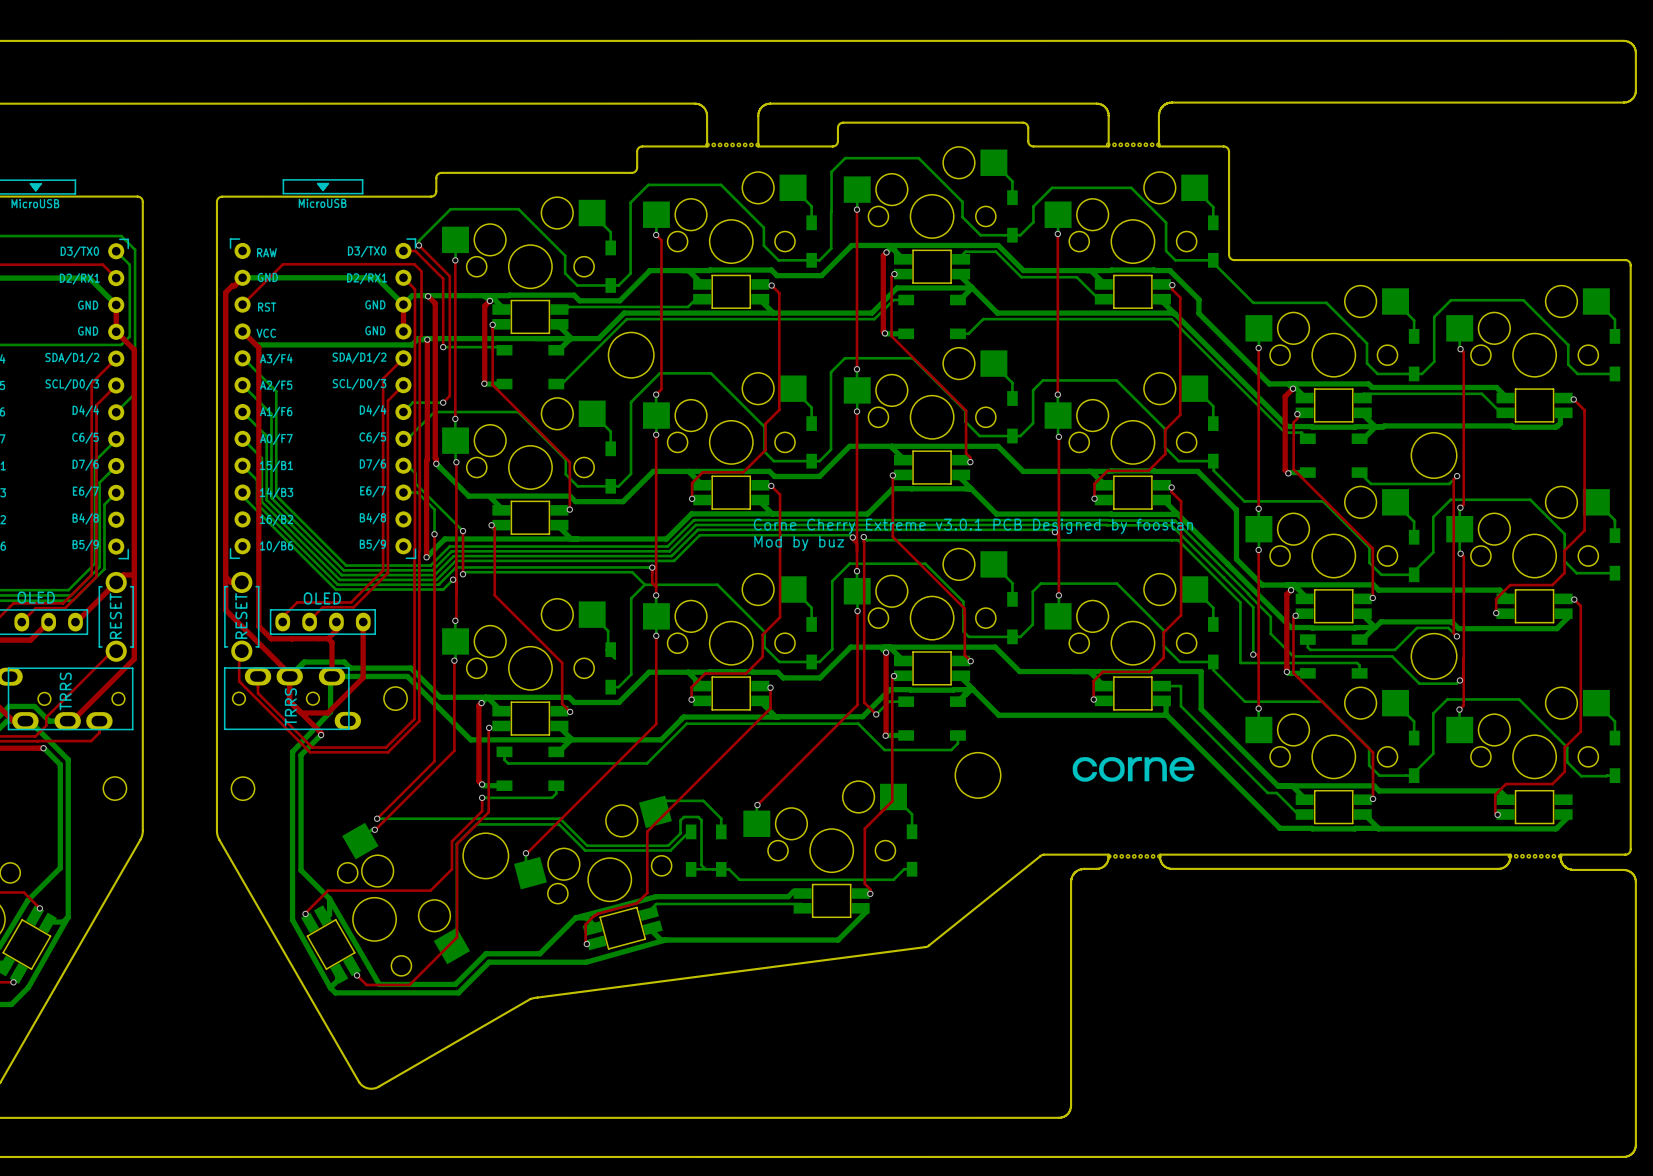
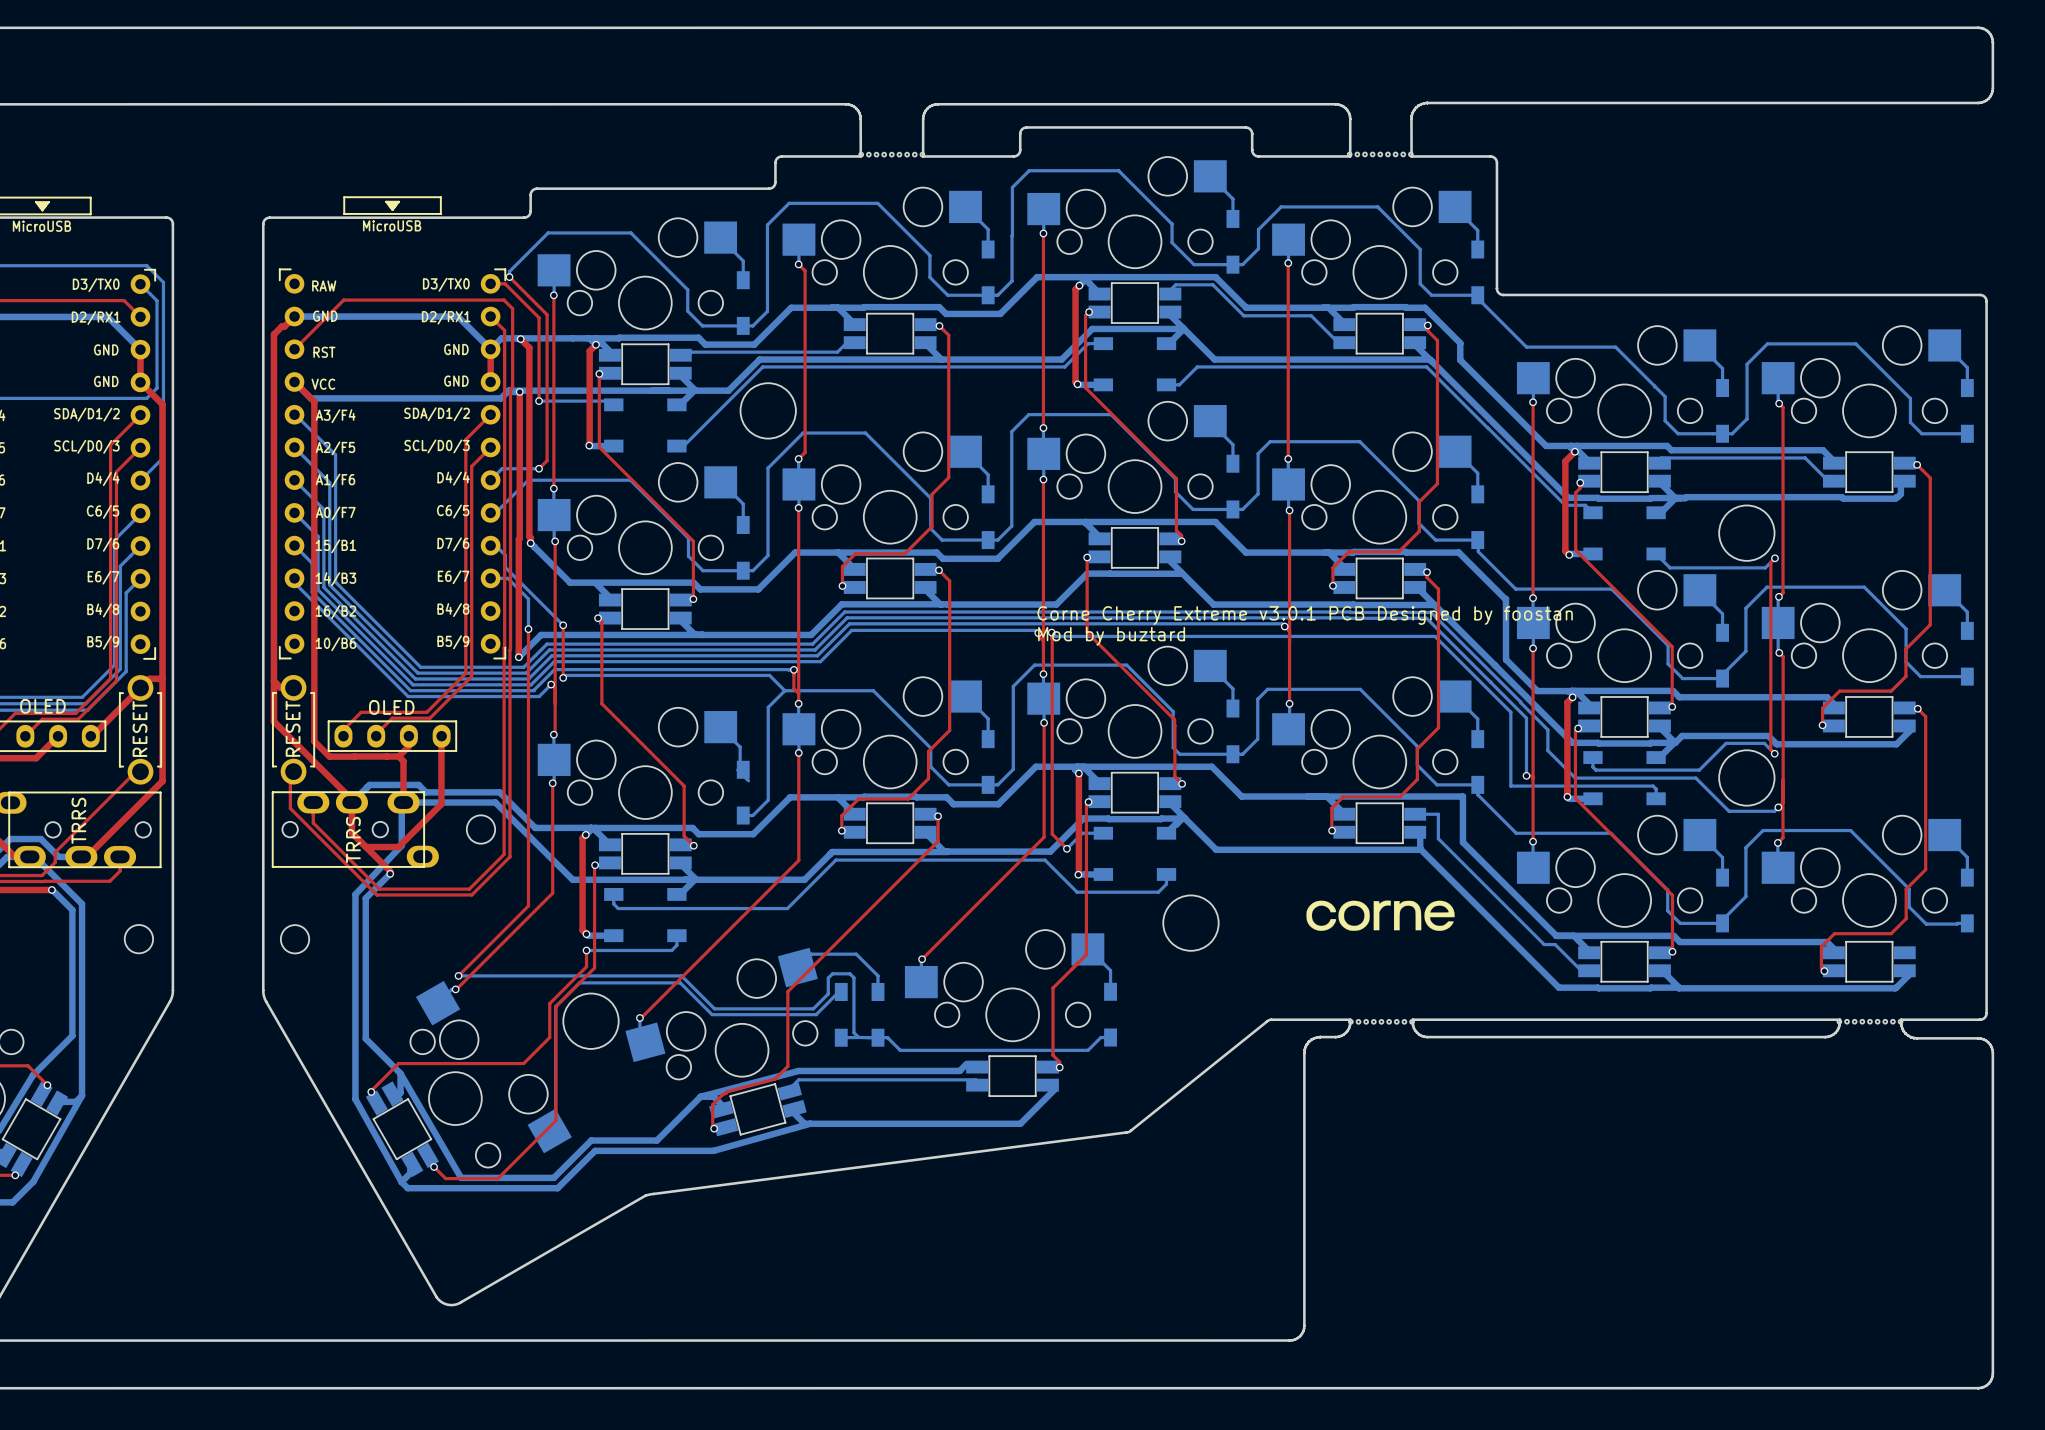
text position: Corne Cherry Extreme v3.0.1 PCB Designed by foostan (973, 526) -> Corne Cherry Extreme v3.0.1 PCB Designed by foostan (1305, 615)
text: Mod by buz (799, 543) -> Mod by buztard (1111, 636)

